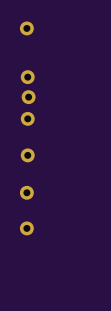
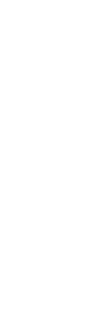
via: (26, 28) -> none
via: (27, 77) -> none
via: (28, 97) -> none
via: (27, 118) -> none
via: (27, 155) -> none
via: (26, 192) -> none
via: (26, 228) -> none

